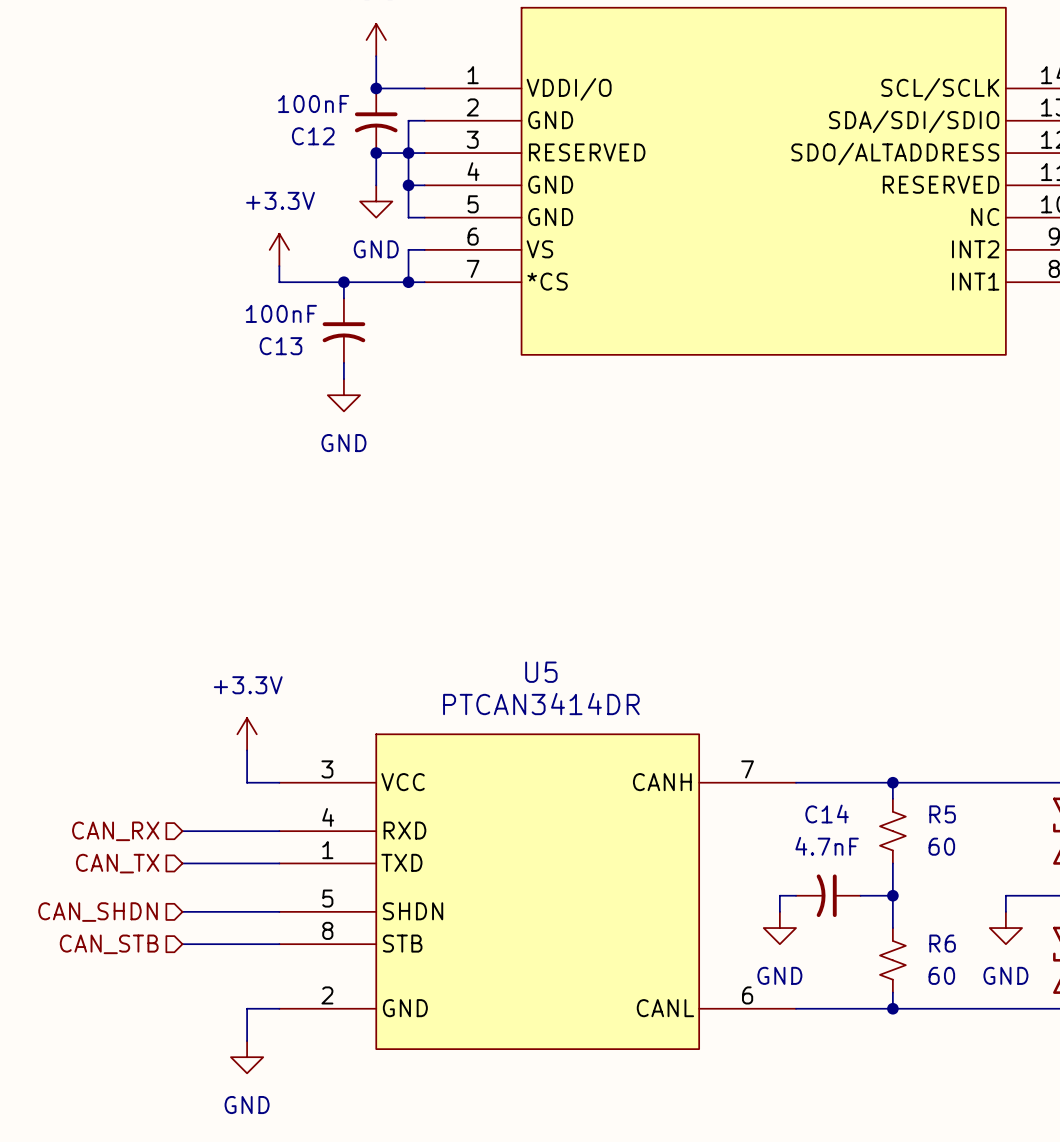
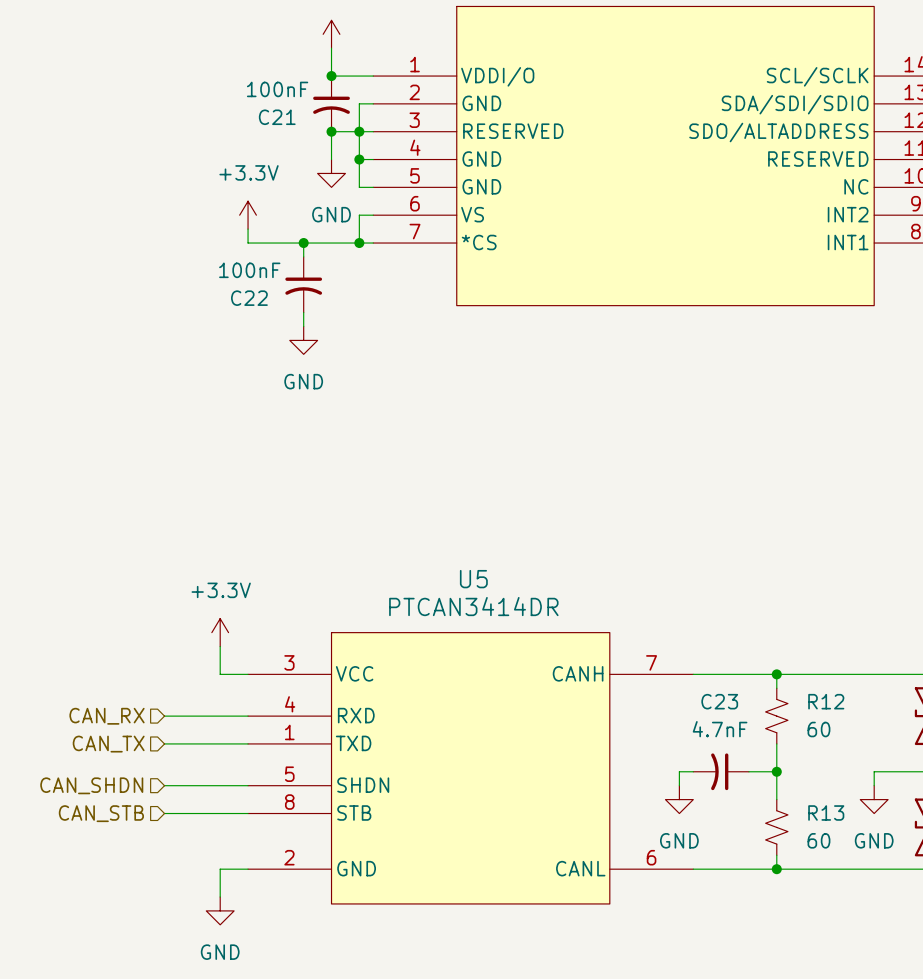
C12 name: C12 (313, 136) -> C21 (277, 117)
C13 name: C13 (280, 346) -> C22 (249, 298)
C14 name: C14 (827, 814) -> C23 (719, 701)
R5 name: R5 (942, 814) -> R12 (826, 701)
R6 name: R6 (942, 943) -> R13 (826, 812)

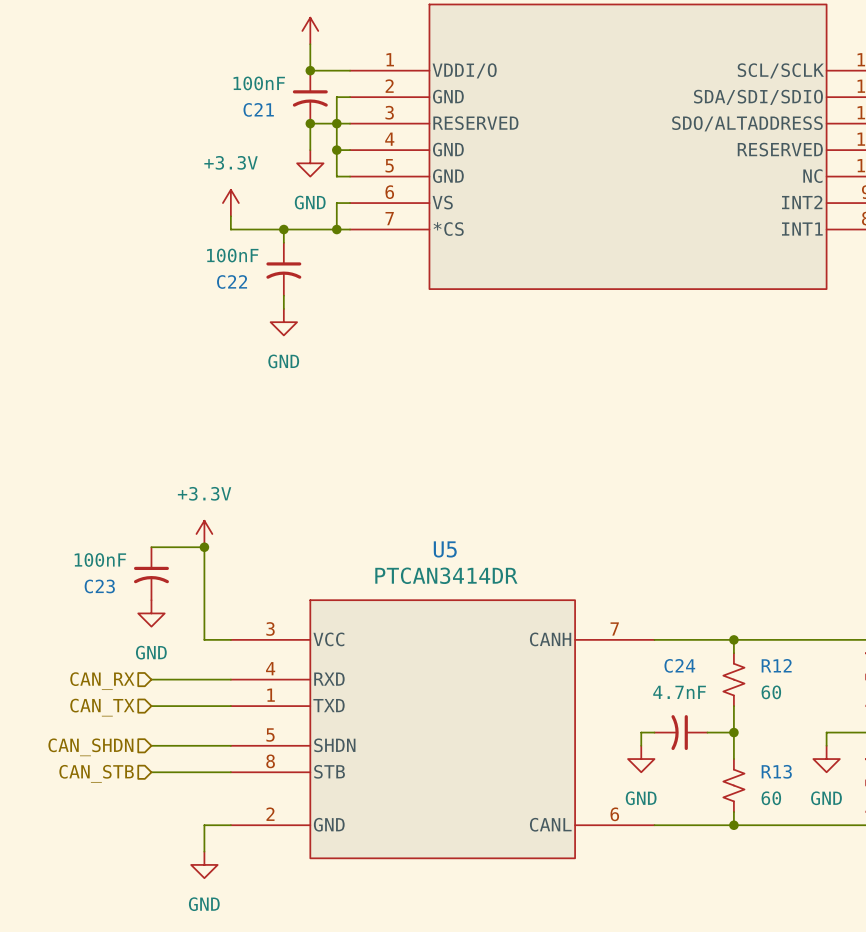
wire: none -> (151, 547) (204, 547) (204, 613)
junction: none -> (204, 547)
C23: none -> 100nF (151, 573)
power symbol position: +3.3V (220, 632) -> +3.3V (204, 533)
power symbol: none -> GND (151, 613)
C23 name: C23 (719, 701) -> C24 (679, 665)

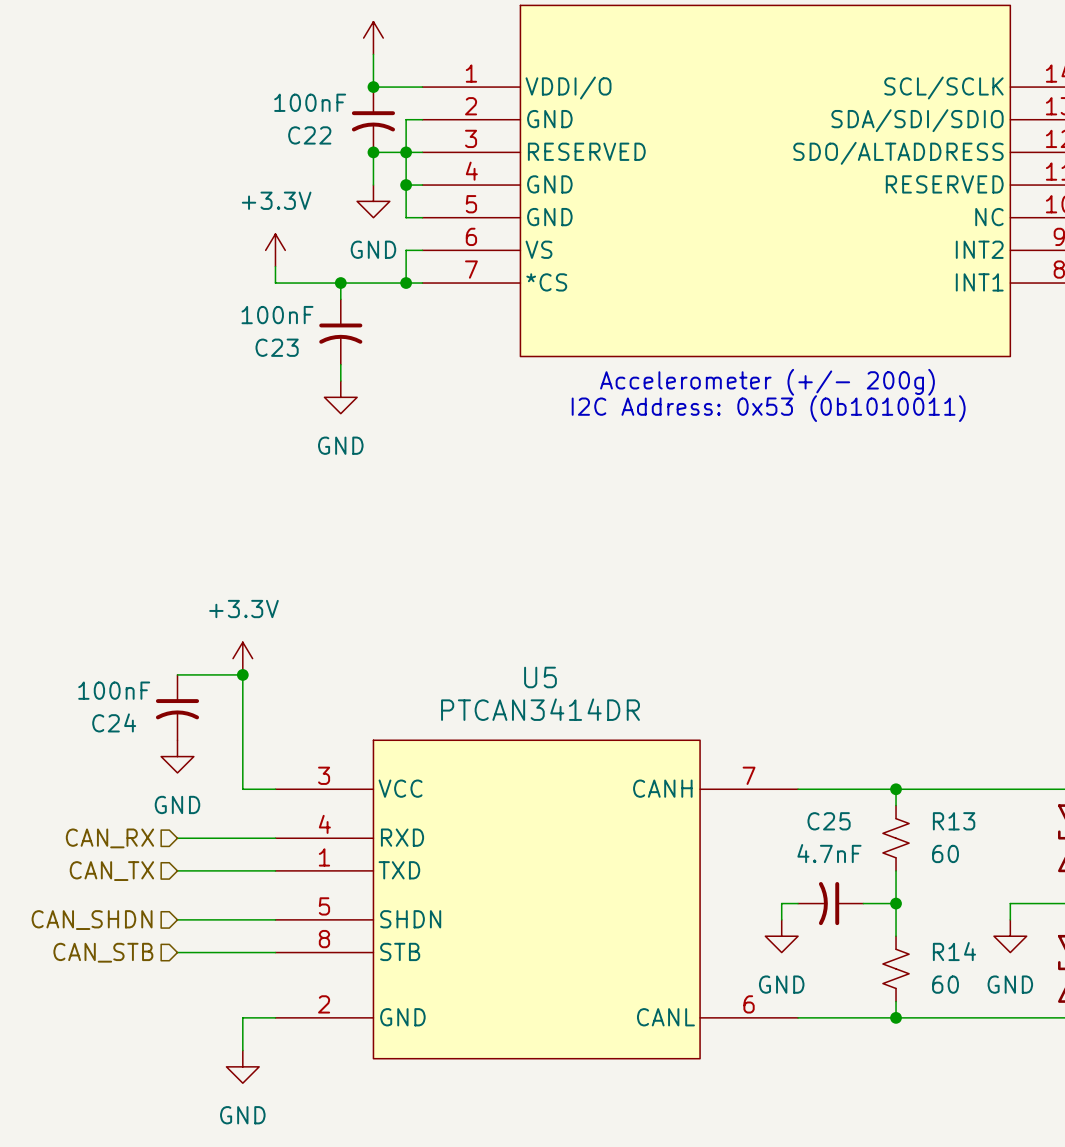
C21 name: C21 (258, 109) -> C22 (309, 135)
C22 name: C22 (232, 281) -> C23 (277, 347)
text: none -> Accelerometer (+/- 200g) (767, 382)
text: none -> I2C Address: 0x53 (0b1010011) (768, 408)
C23 name: C23 (99, 586) -> C24 (114, 722)
C24 name: C24 (679, 665) -> C25 (829, 821)
R12 name: R12 (776, 665) -> R13 (954, 821)
R13 name: R13 (776, 771) -> R14 (954, 951)

